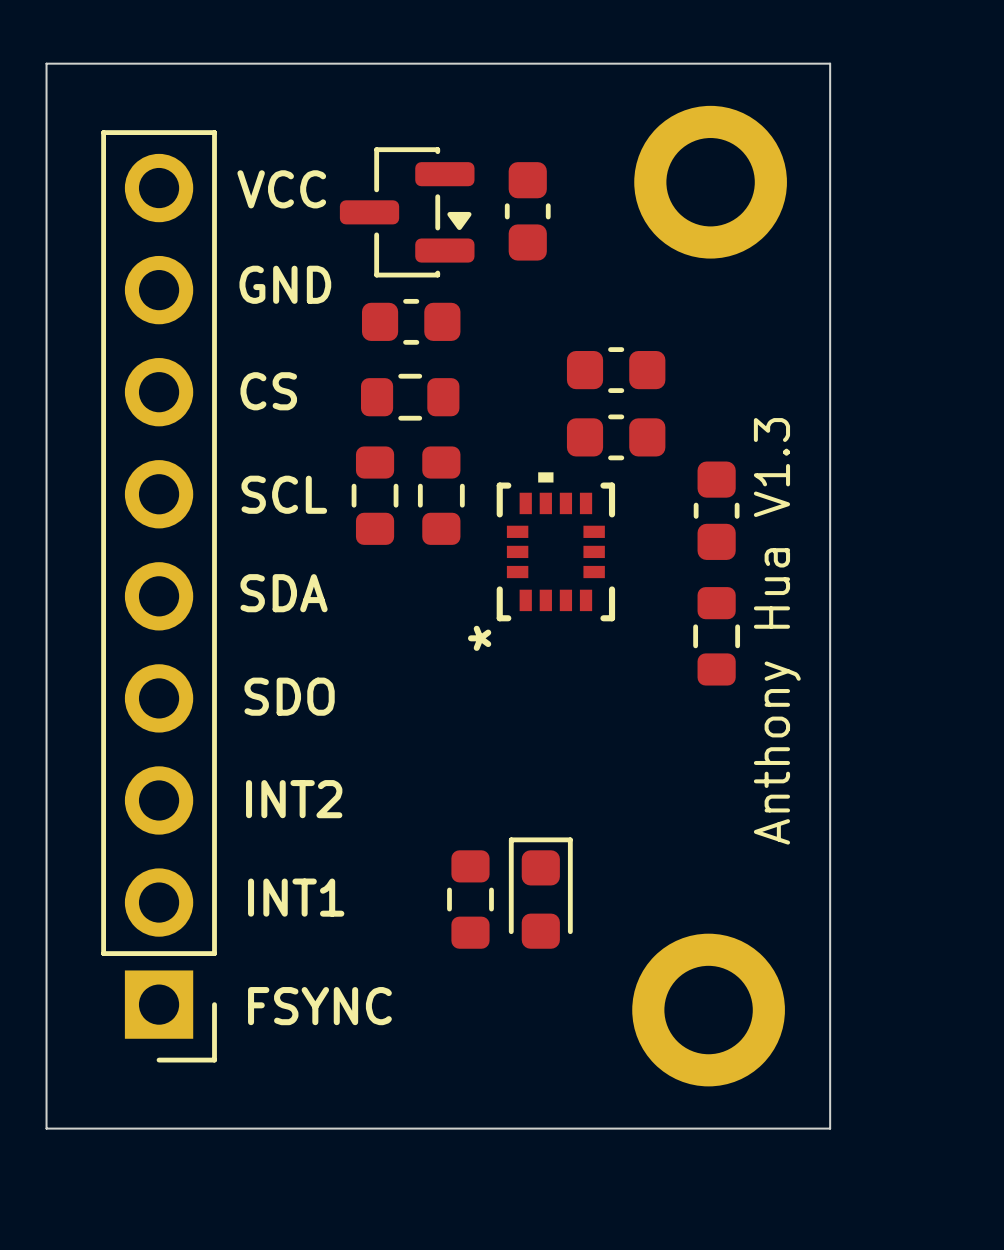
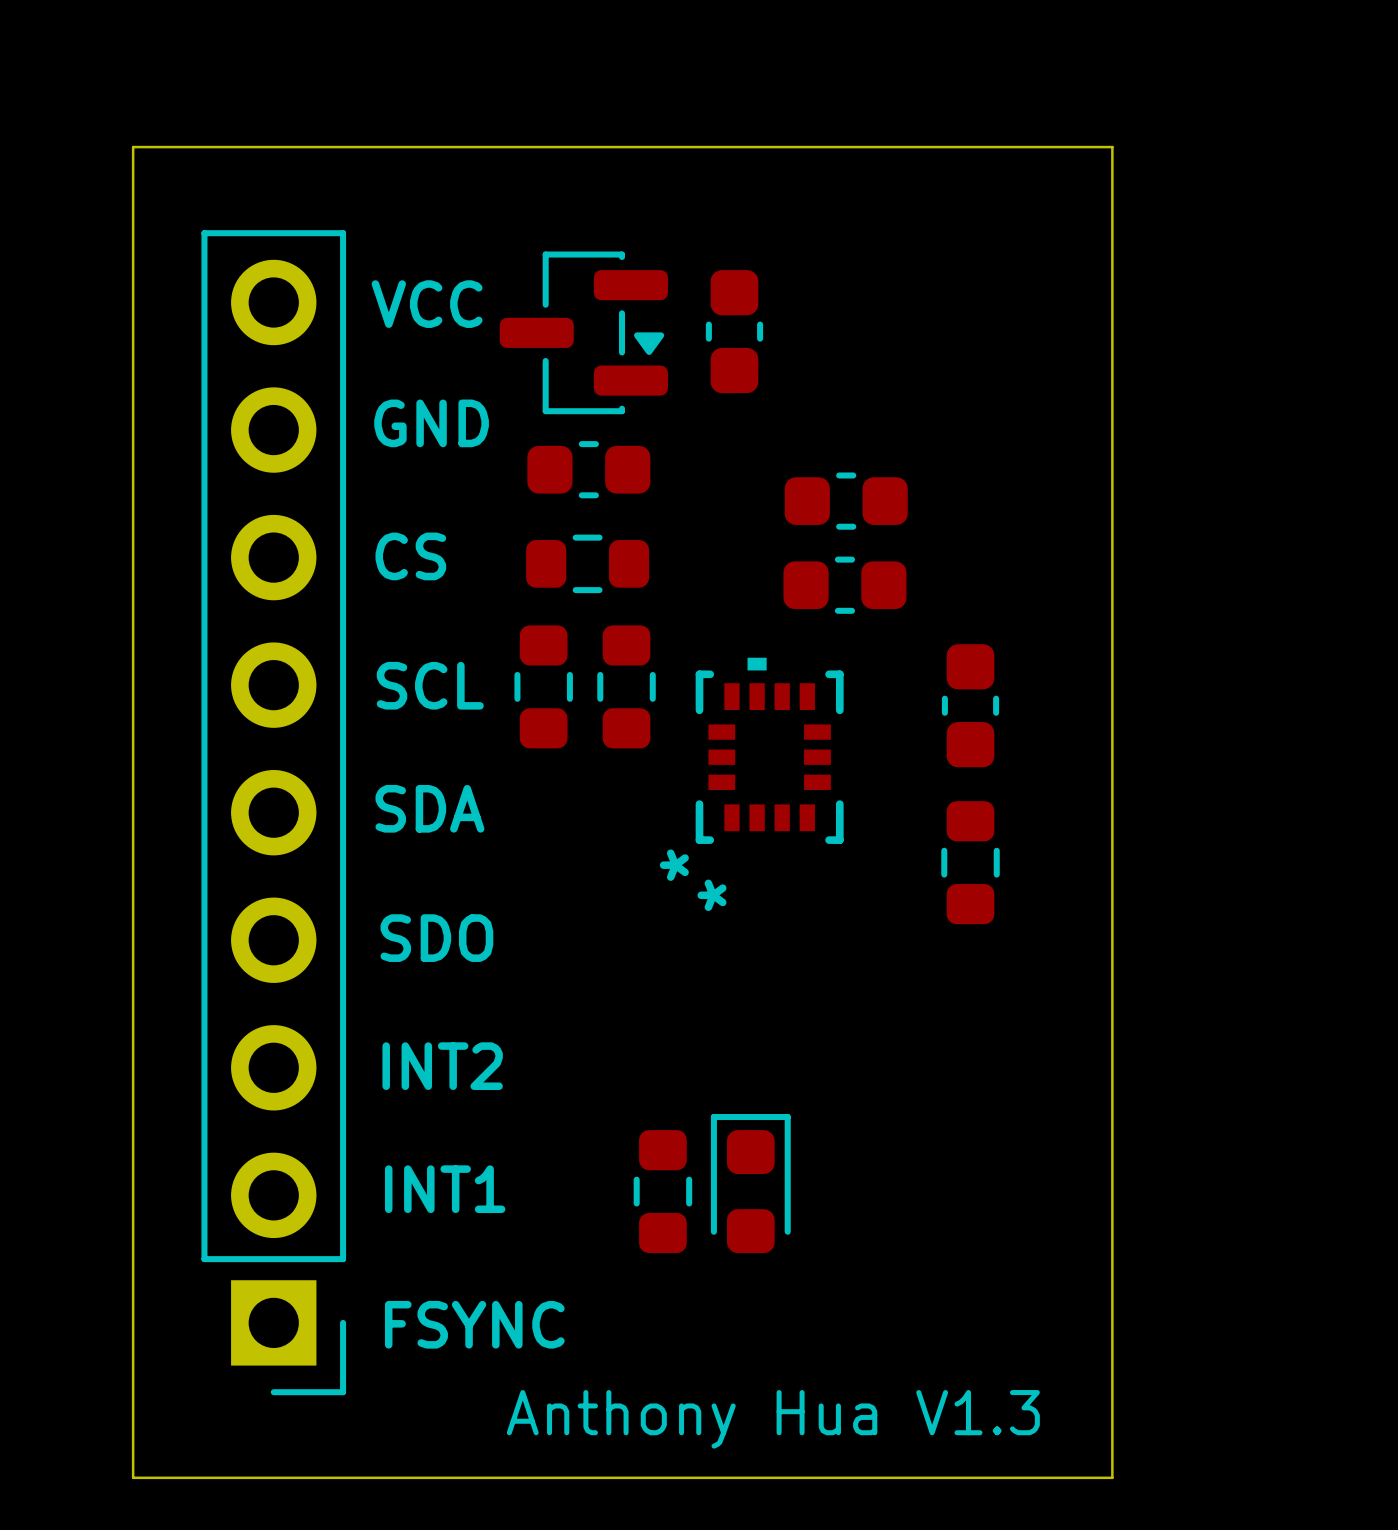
part: (710, 182) -> none
part: none -> (846, 501)
part: (616, 370) -> none
part: none -> (844, 585)
part: (616, 437) -> none
text rotation: 0° (777, 631) -> 90° clockwise (773, 1419)
text position: Anthony Hua V1.3 (777, 631) -> Anthony Hua V1.3 (773, 1419)
part text: none -> * (711, 895)
part: (708, 1010) -> none

